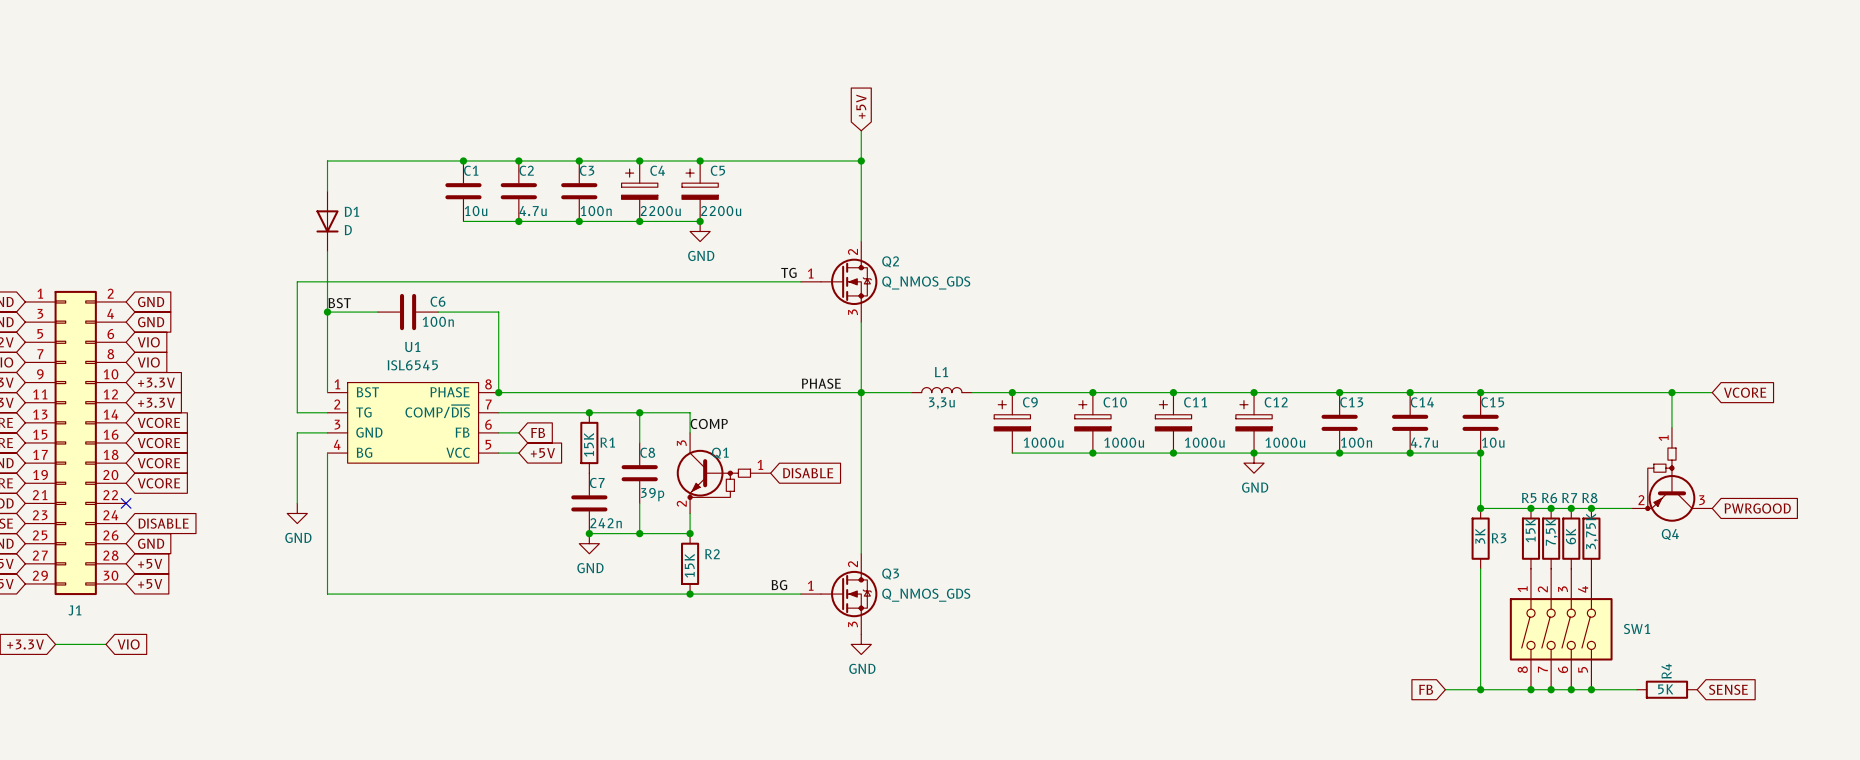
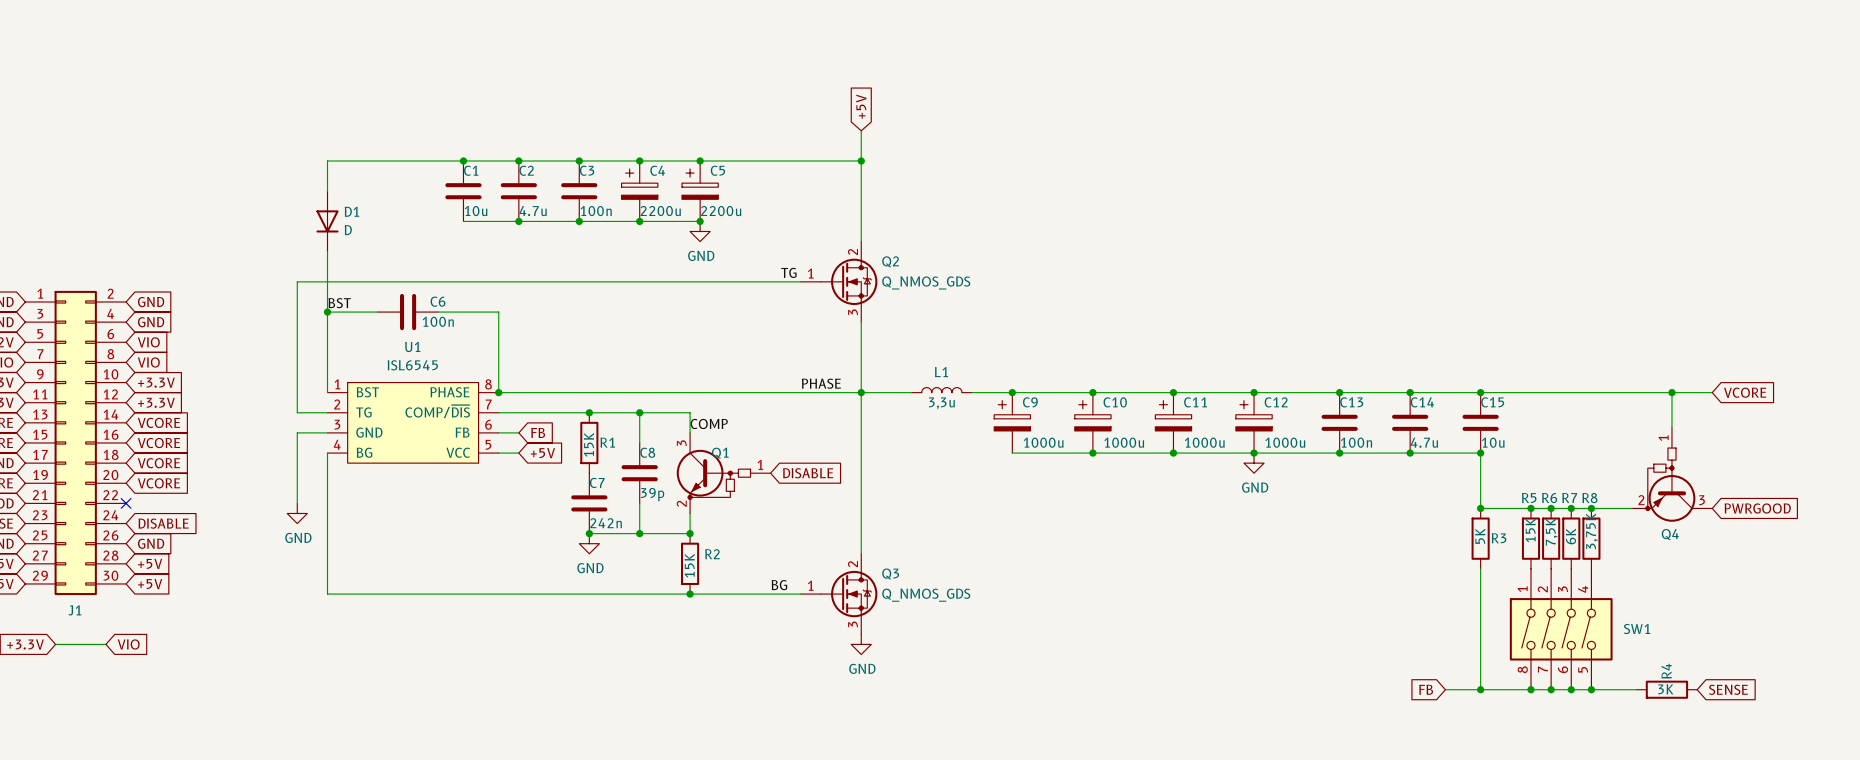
R3 value: 3K (1480, 536) -> 5K (1480, 536)
R4 value: 5K (1665, 689) -> 3K (1665, 689)

